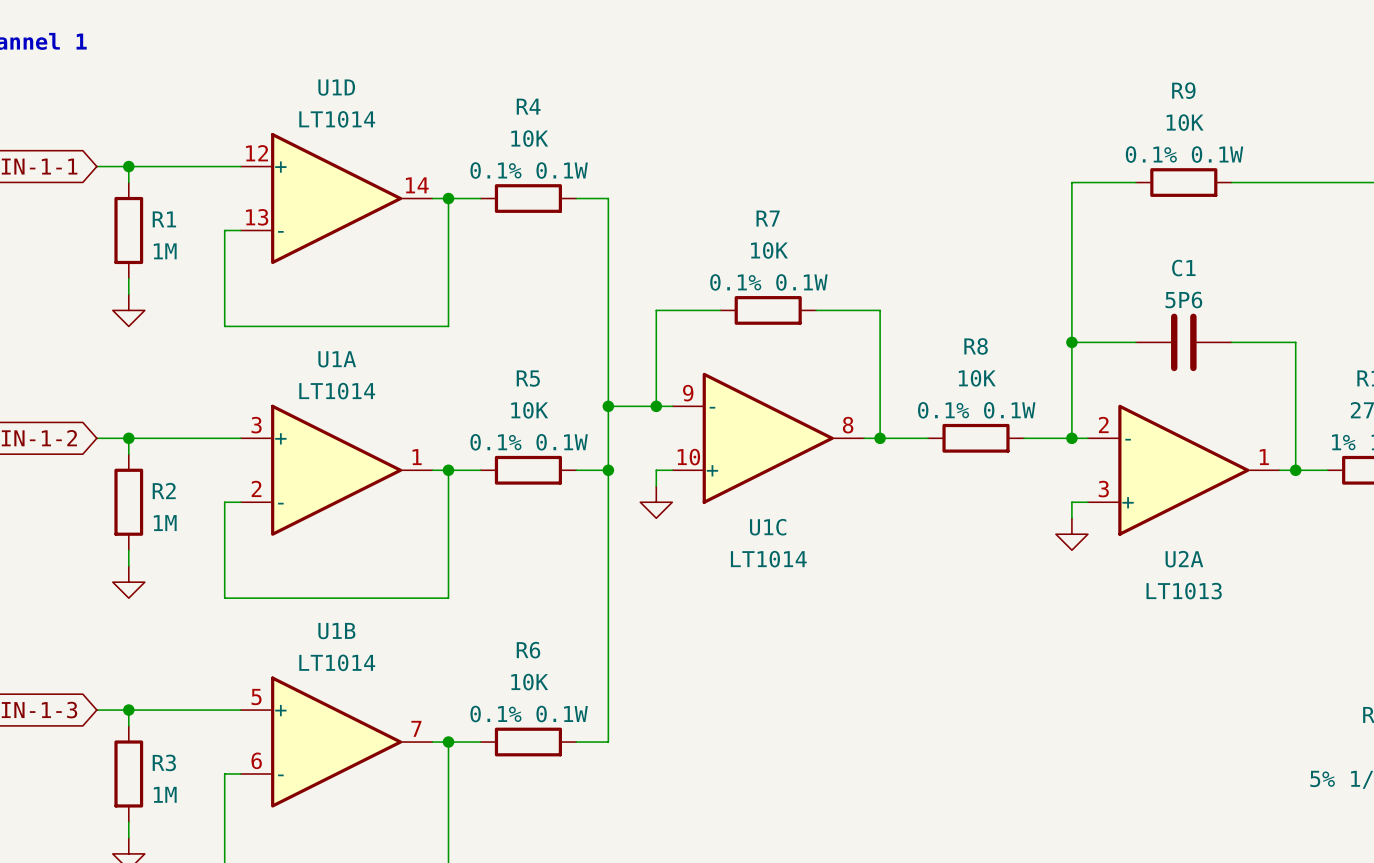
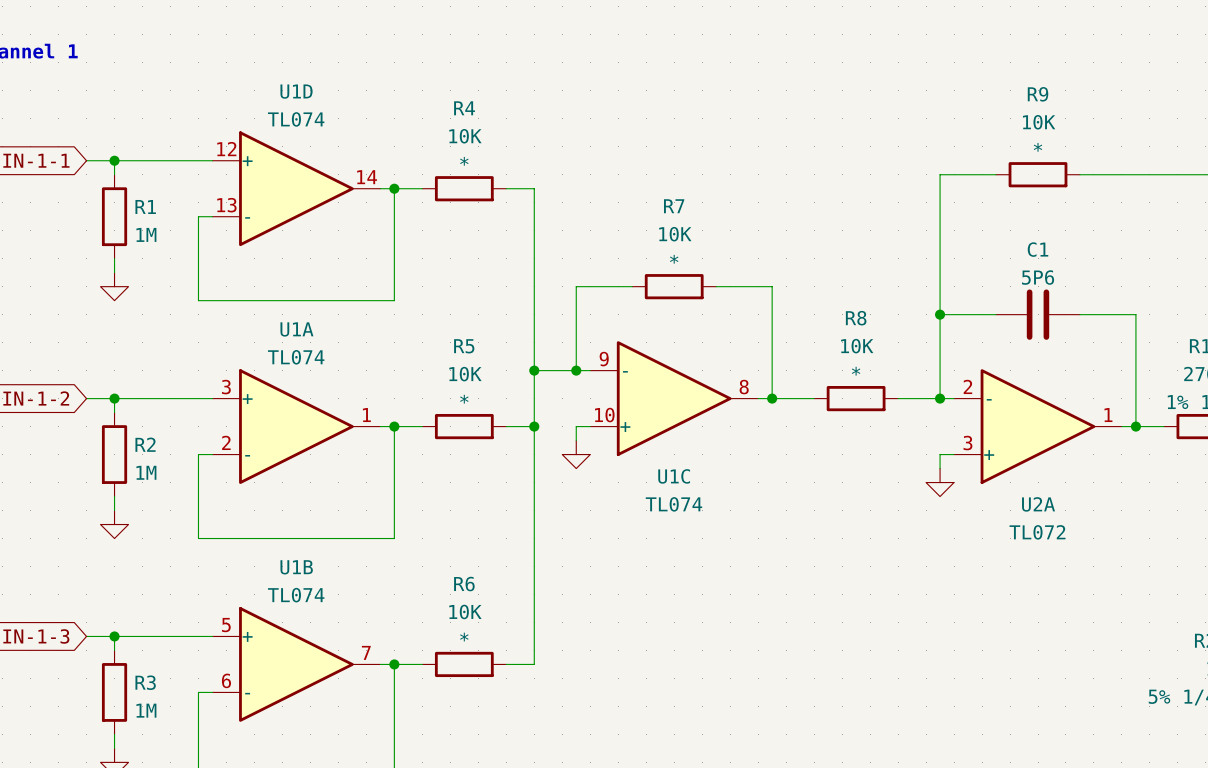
U1D value: LT1014 (337, 119) -> TL074 (296, 119)
R9 text: 0.1% 0.1W (1184, 154) -> * (1038, 147)
R4 text: 0.1% 0.1W (529, 170) -> * (464, 161)
R7 text: 0.1% 0.1W (768, 282) -> * (674, 259)
U1A value: LT1014 (337, 391) -> TL074 (296, 357)
R8 text: 0.1% 0.1W (976, 410) -> * (856, 371)
R5 text: 0.1% 0.1W (529, 442) -> * (464, 399)
U1C value: LT1014 (768, 559) -> TL074 (673, 504)
U2A value: LT1013 (1184, 591) -> TL072 (1037, 532)
U1B value: LT1014 (337, 662) -> TL074 (296, 595)
R6 text: 0.1% 0.1W (529, 714) -> * (464, 637)

